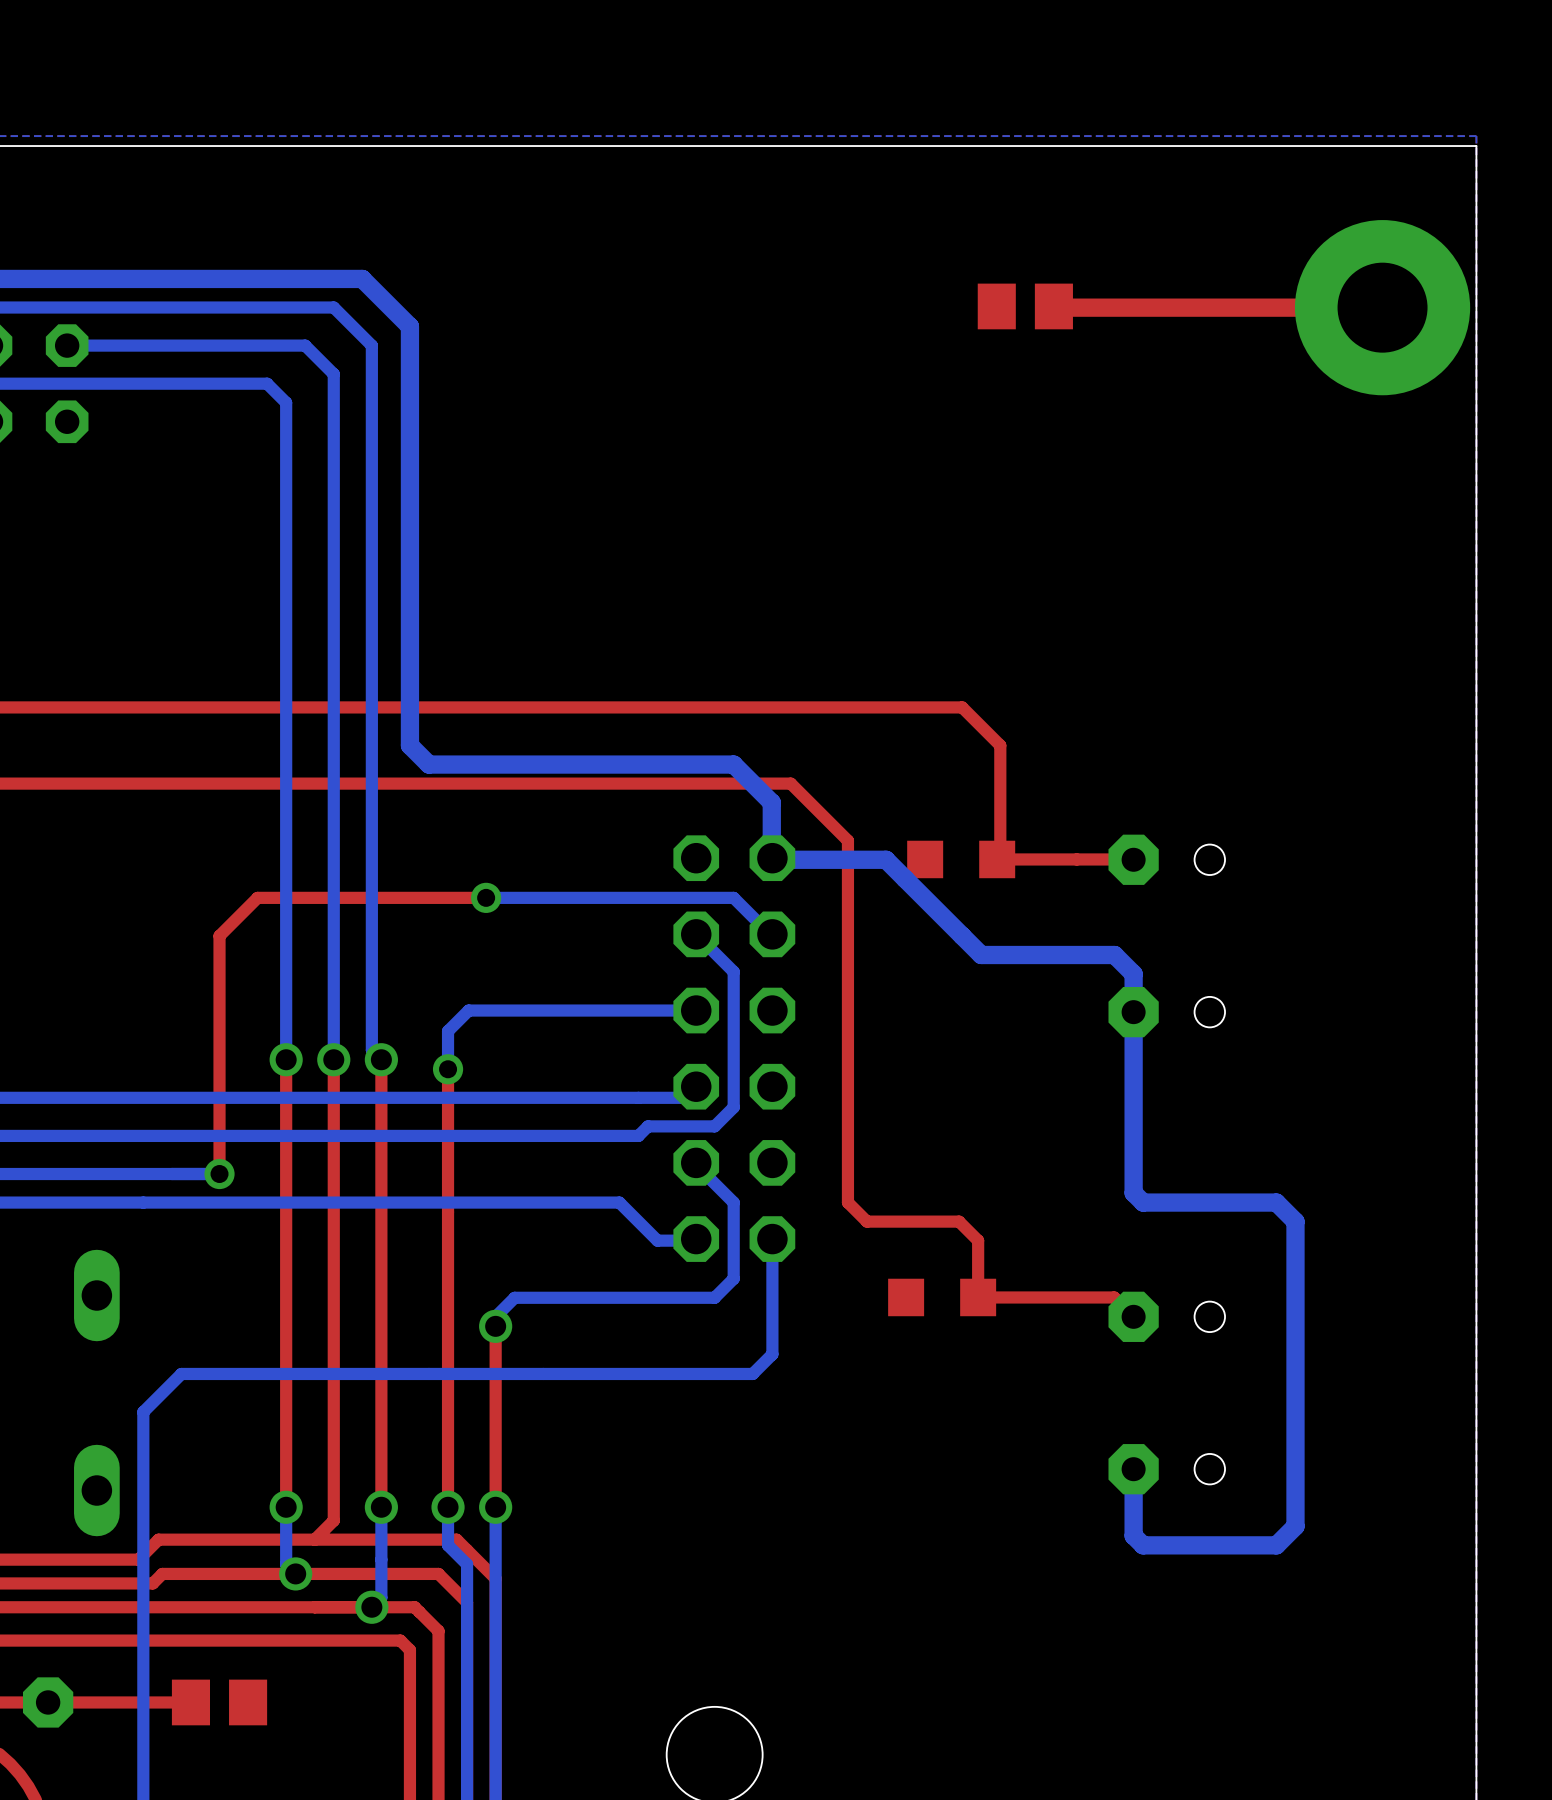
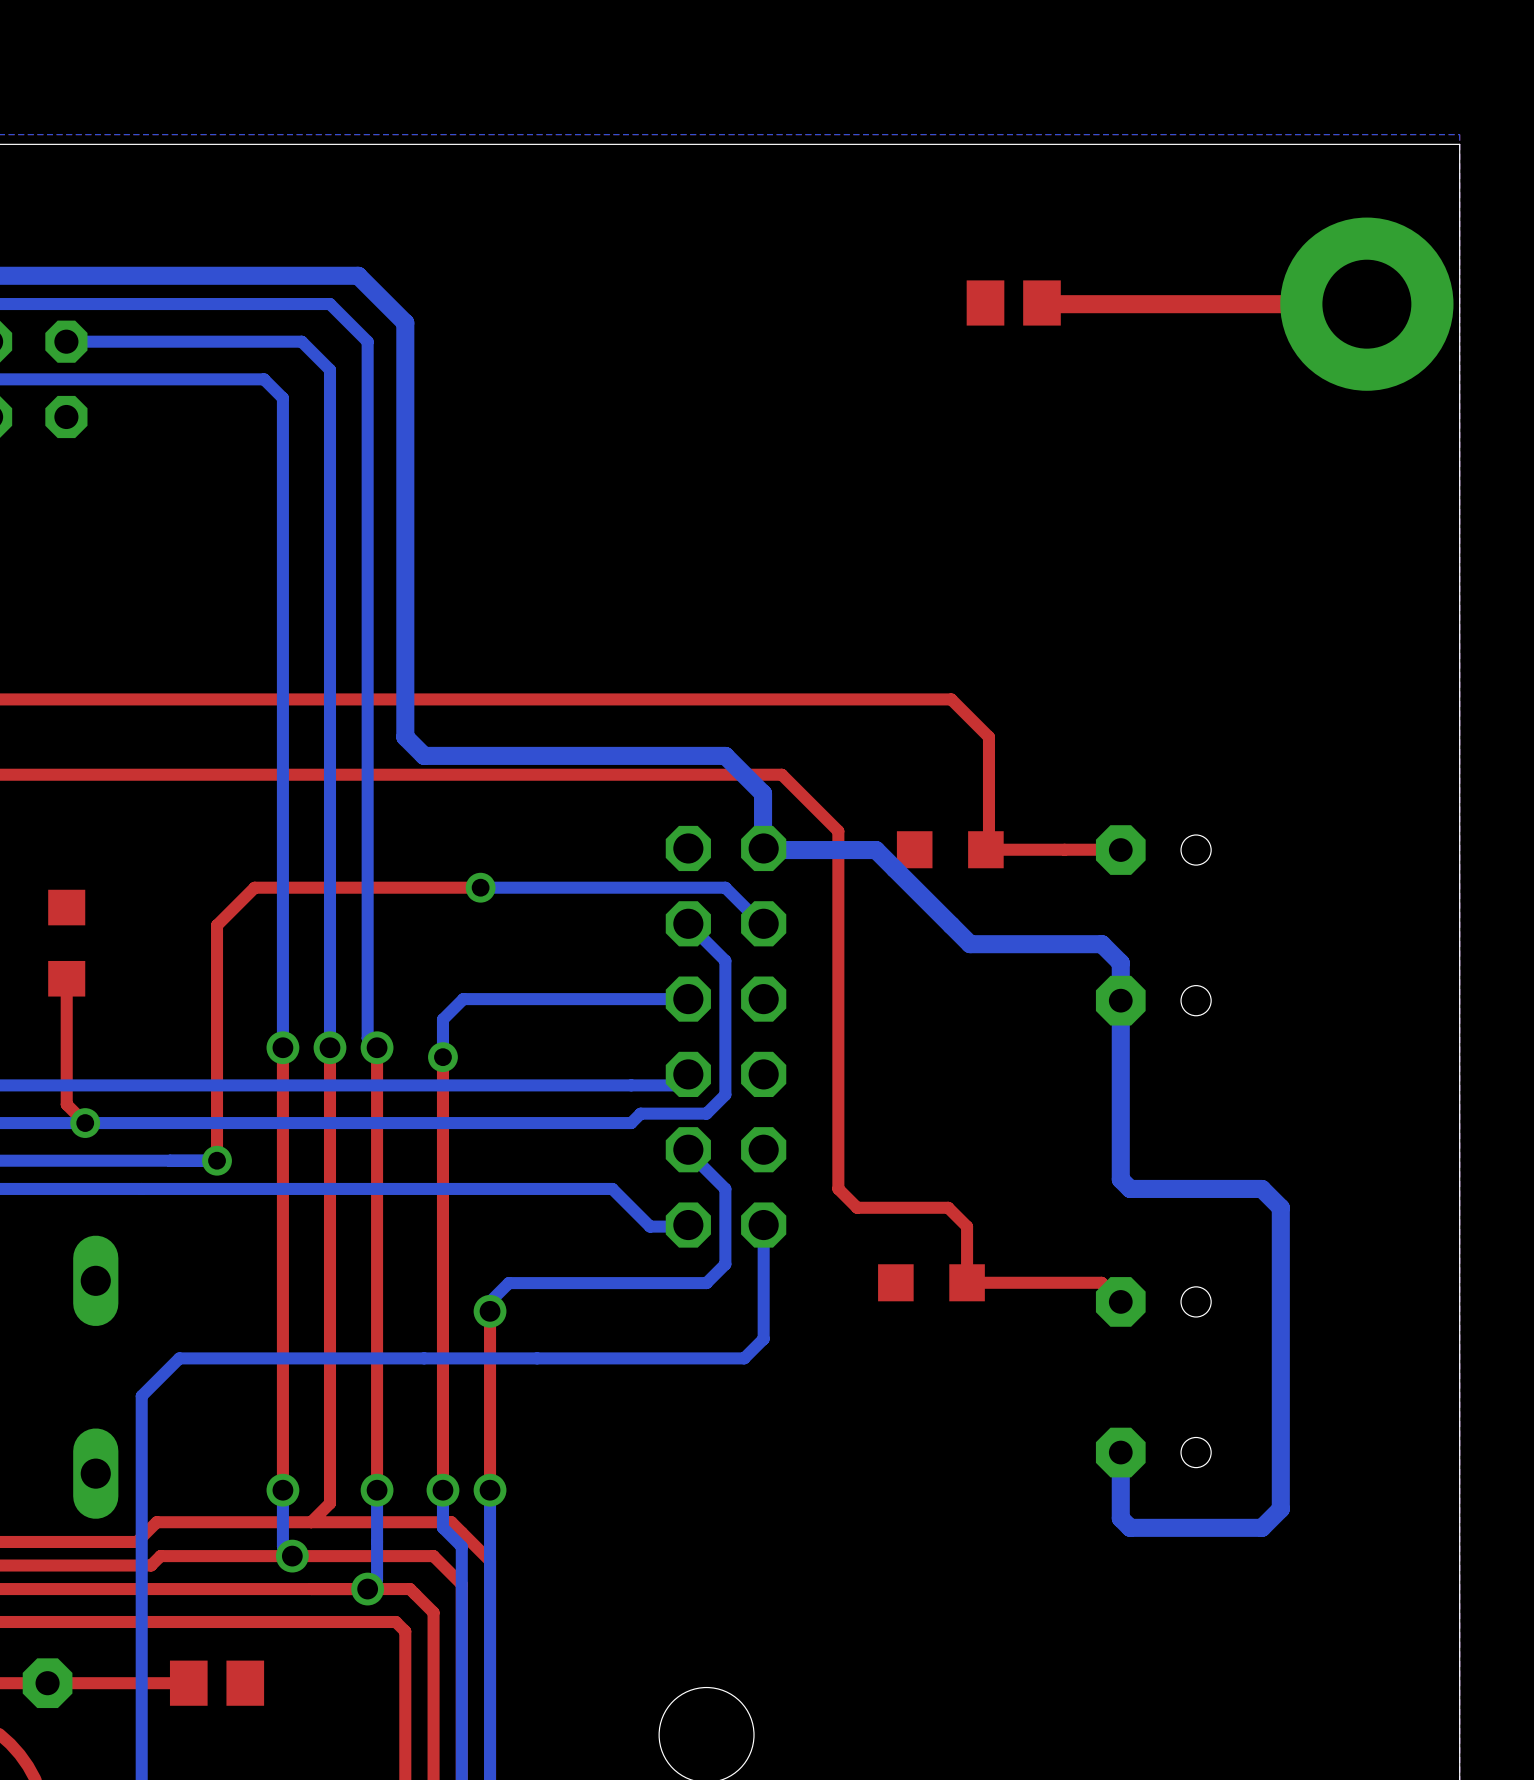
part: none -> (66, 943)
top track: none -> (66, 978) (66, 1104) (85, 1123)
via: none -> (85, 1123)

